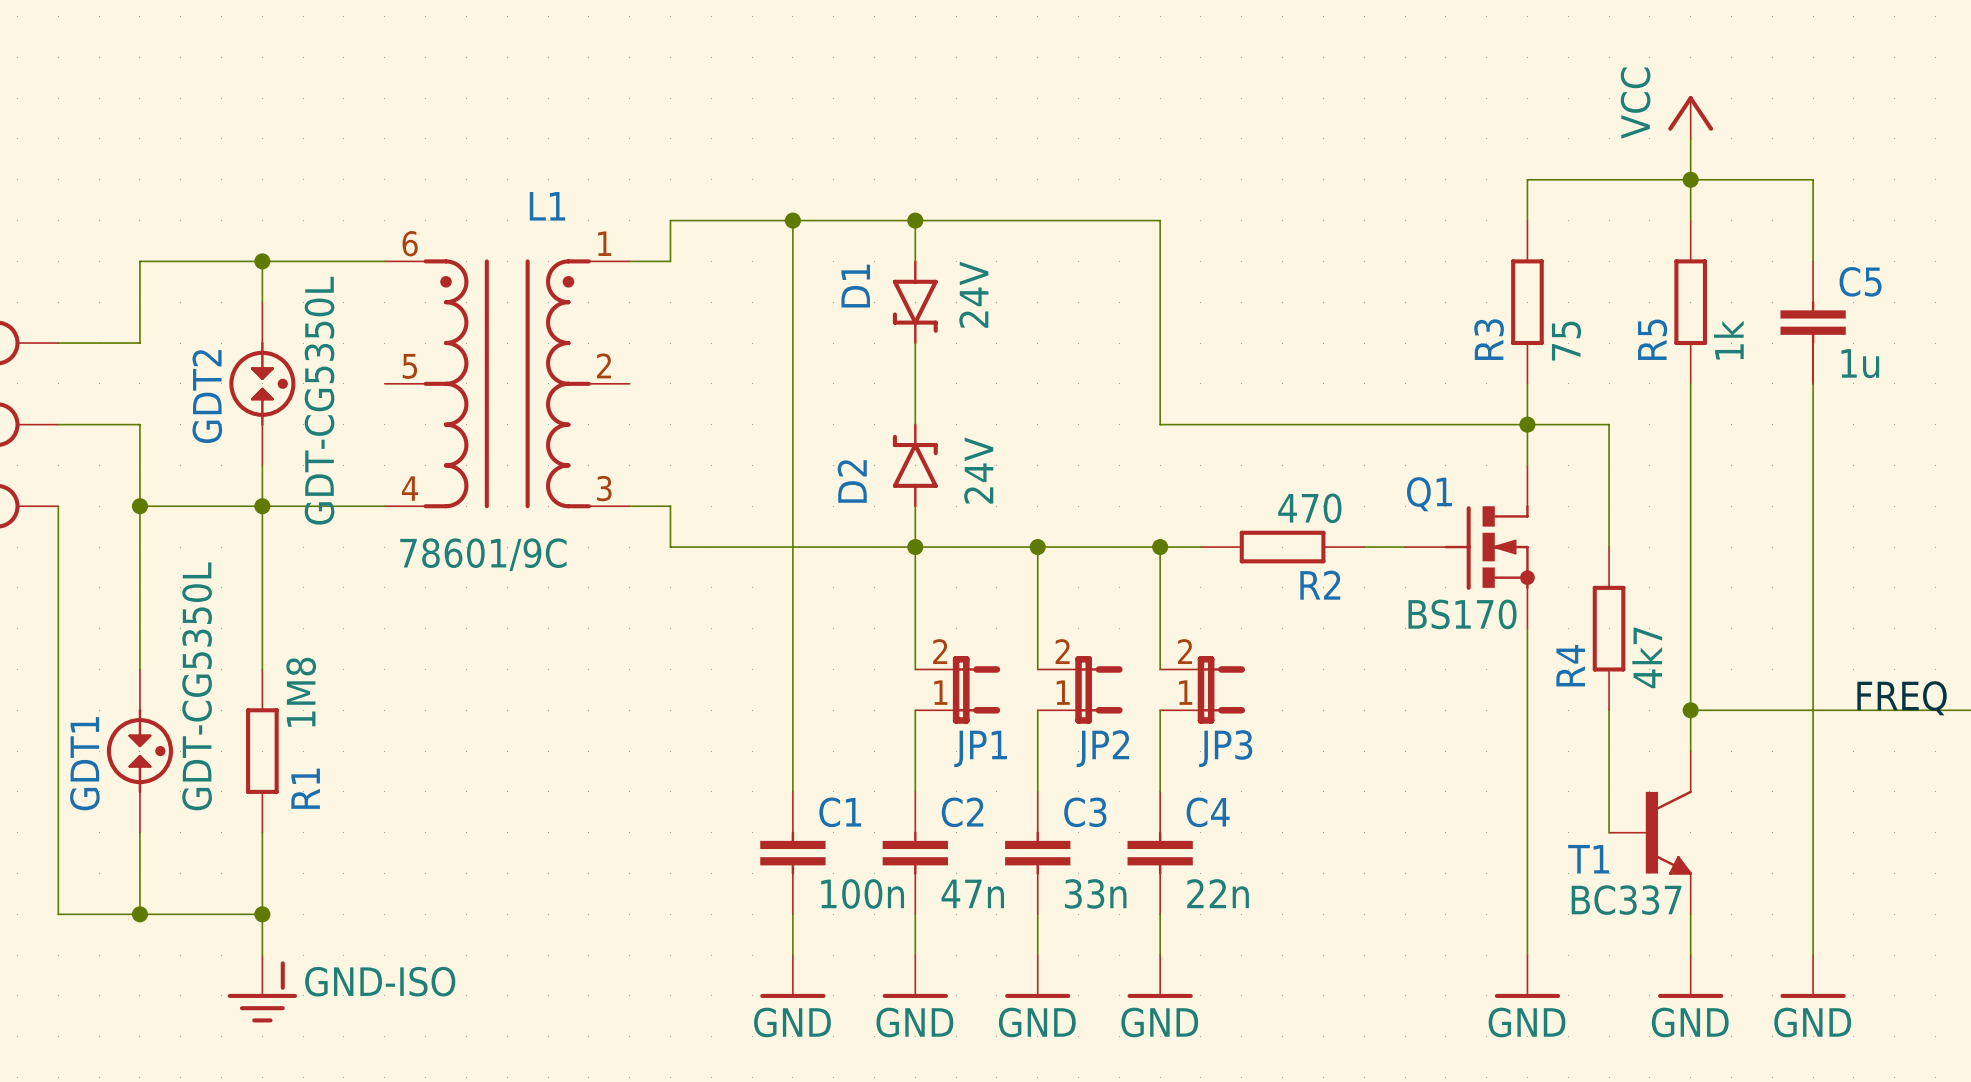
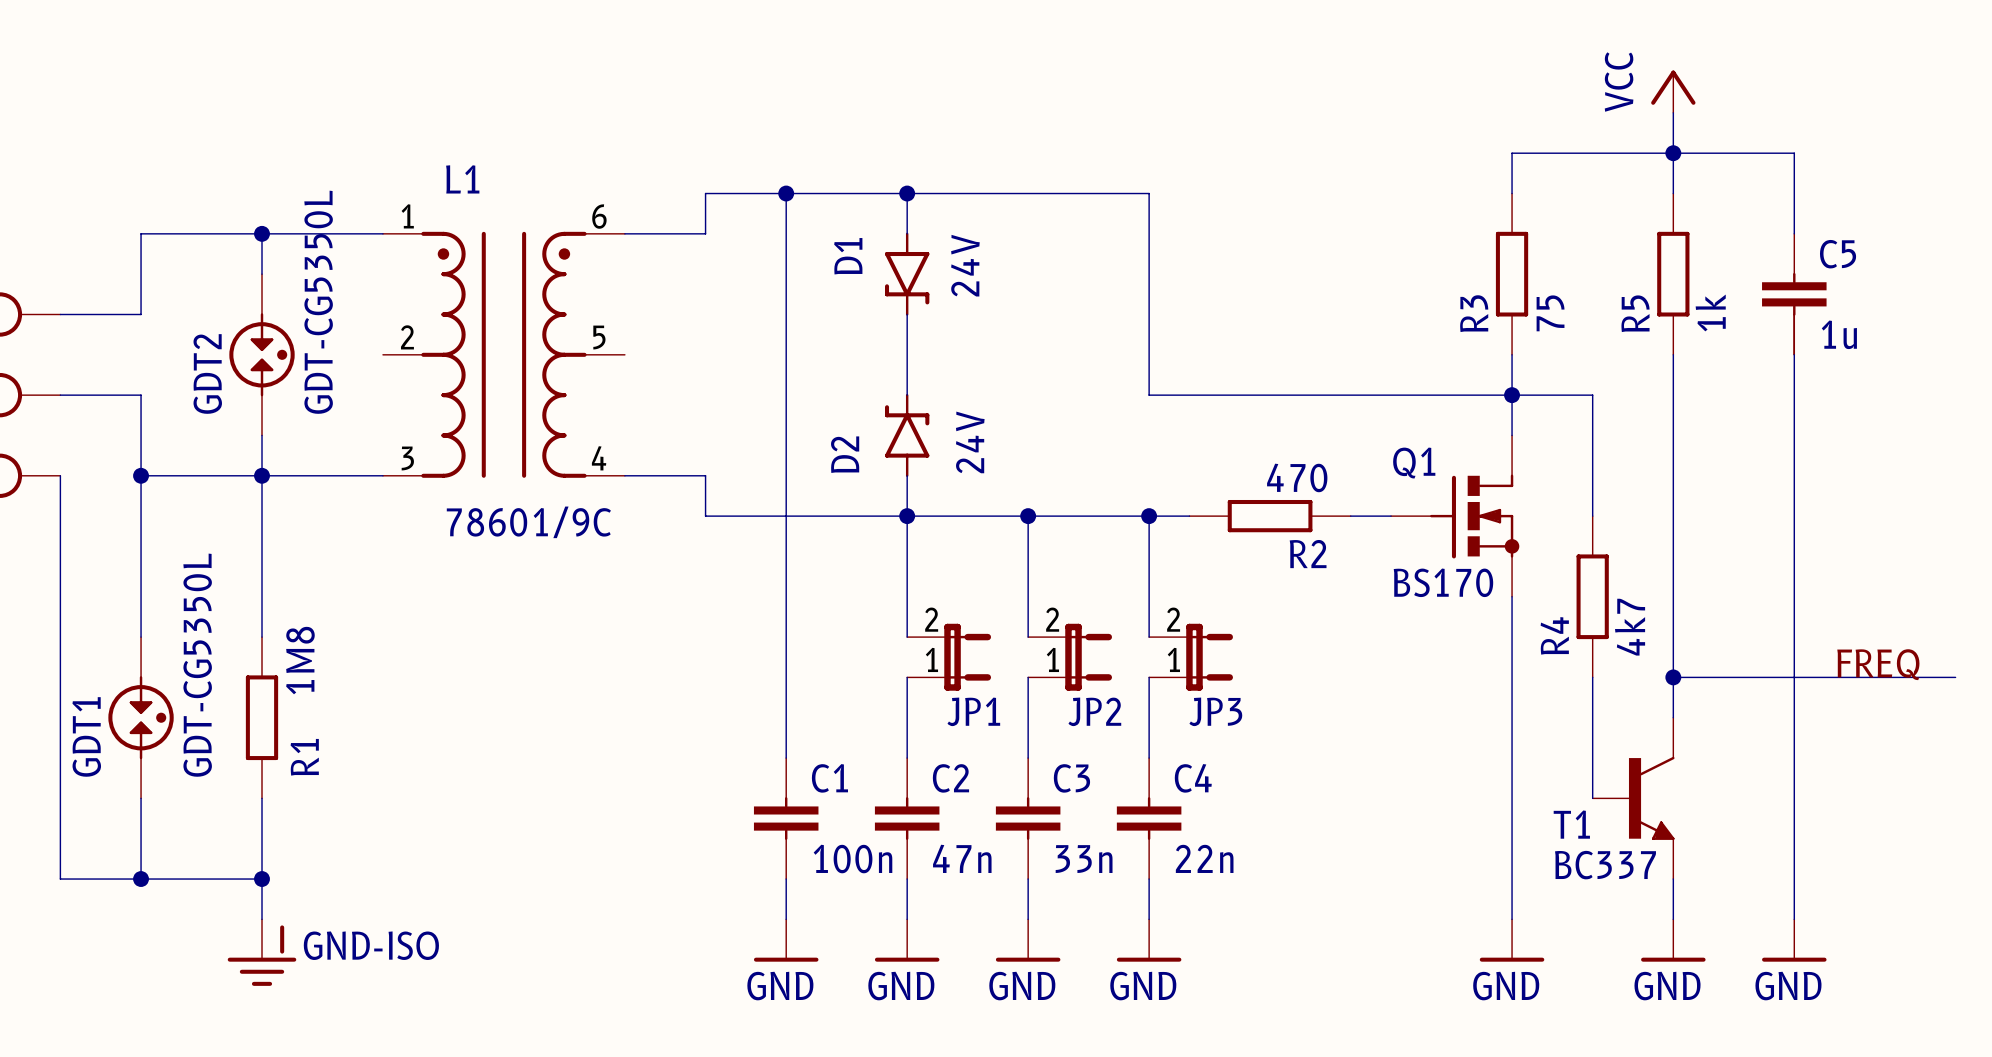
wire: (711, 220) (670, 220) (670, 261) -> (705, 193) (705, 233) (665, 233)
L1 flip: as is (507, 383) -> left-right (503, 354)
GDT2 value position: GDT-CG5350L (319, 400) -> GDT-CG5350L (318, 302)
wire: (670, 506) (670, 547) (711, 547) -> (665, 475) (705, 475) (705, 516)

